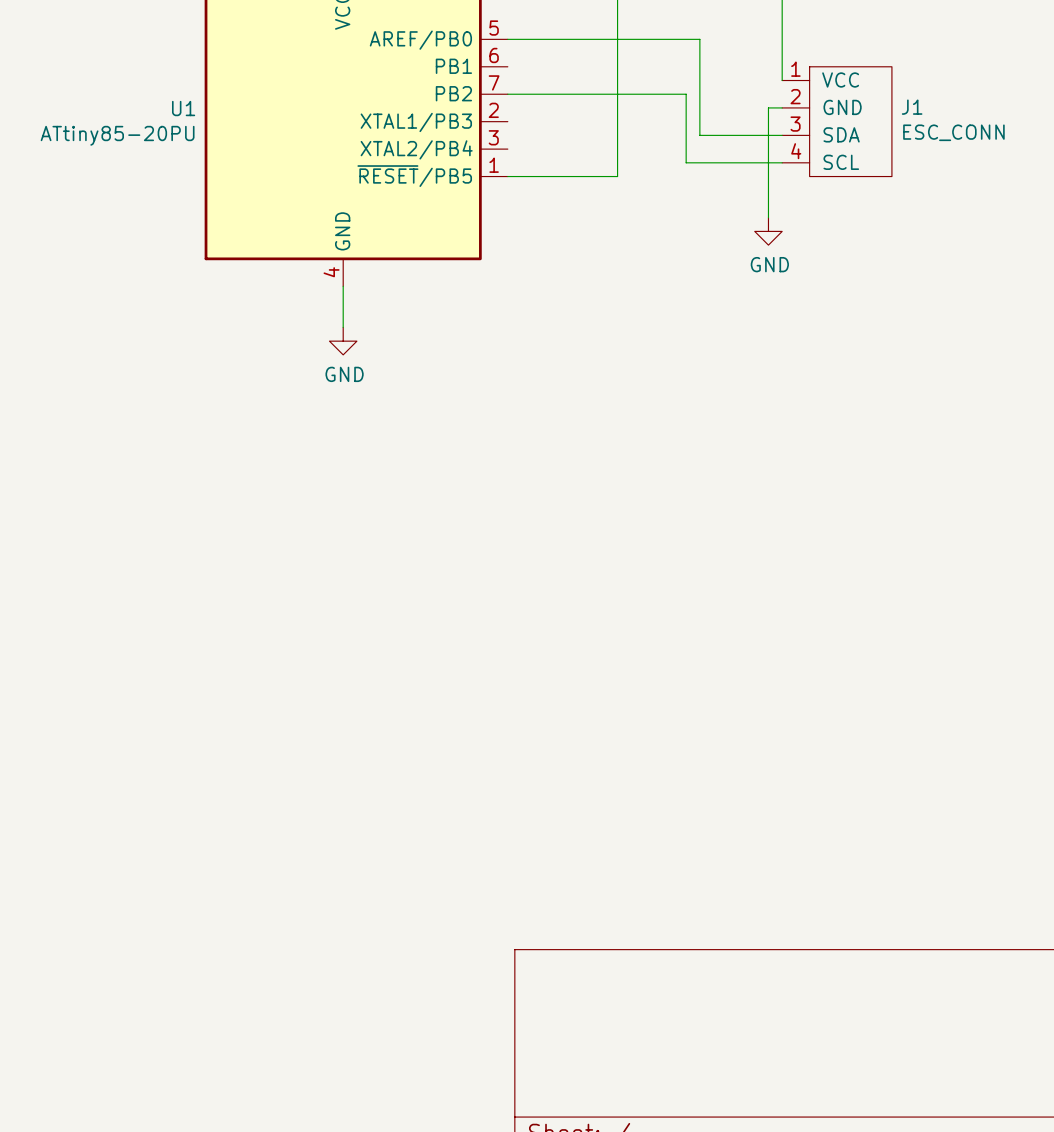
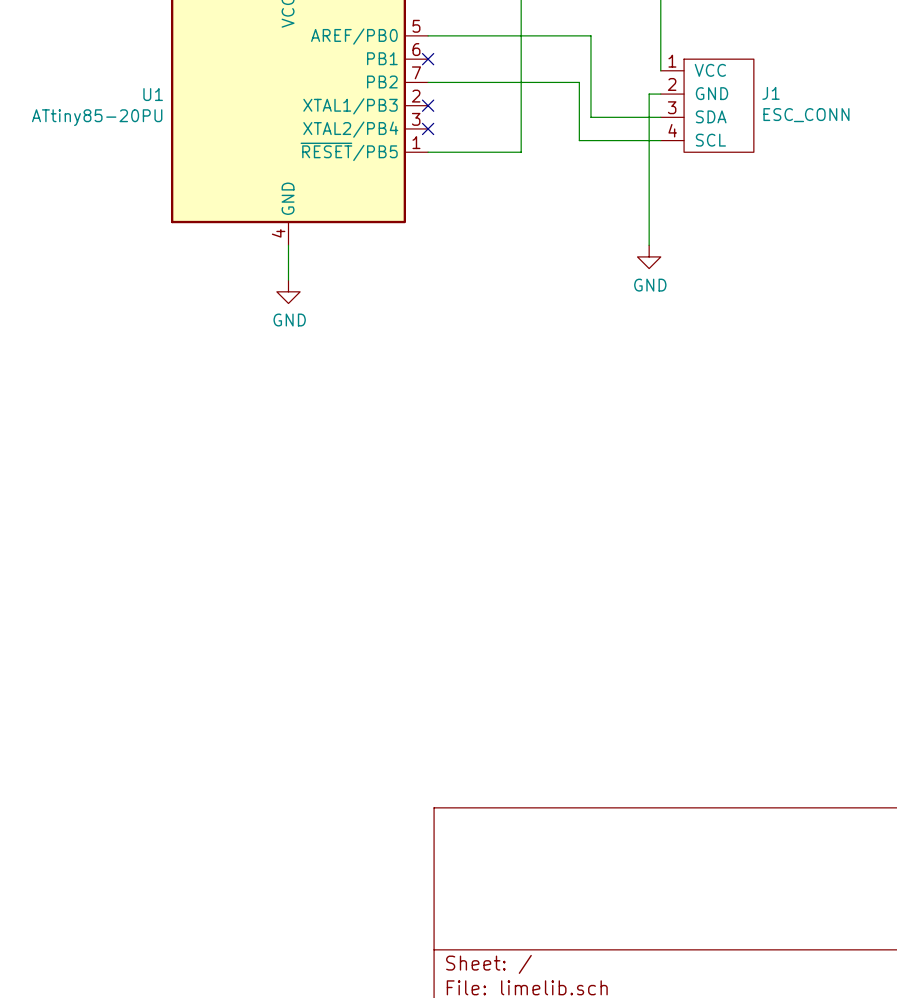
no-connect mark: none -> (428, 59)
no-connect mark: none -> (428, 105)
no-connect mark: none -> (428, 128)
wire: none -> (649, 187) (649, 245)
power symbol position: GND (768, 231) -> GND (649, 256)

